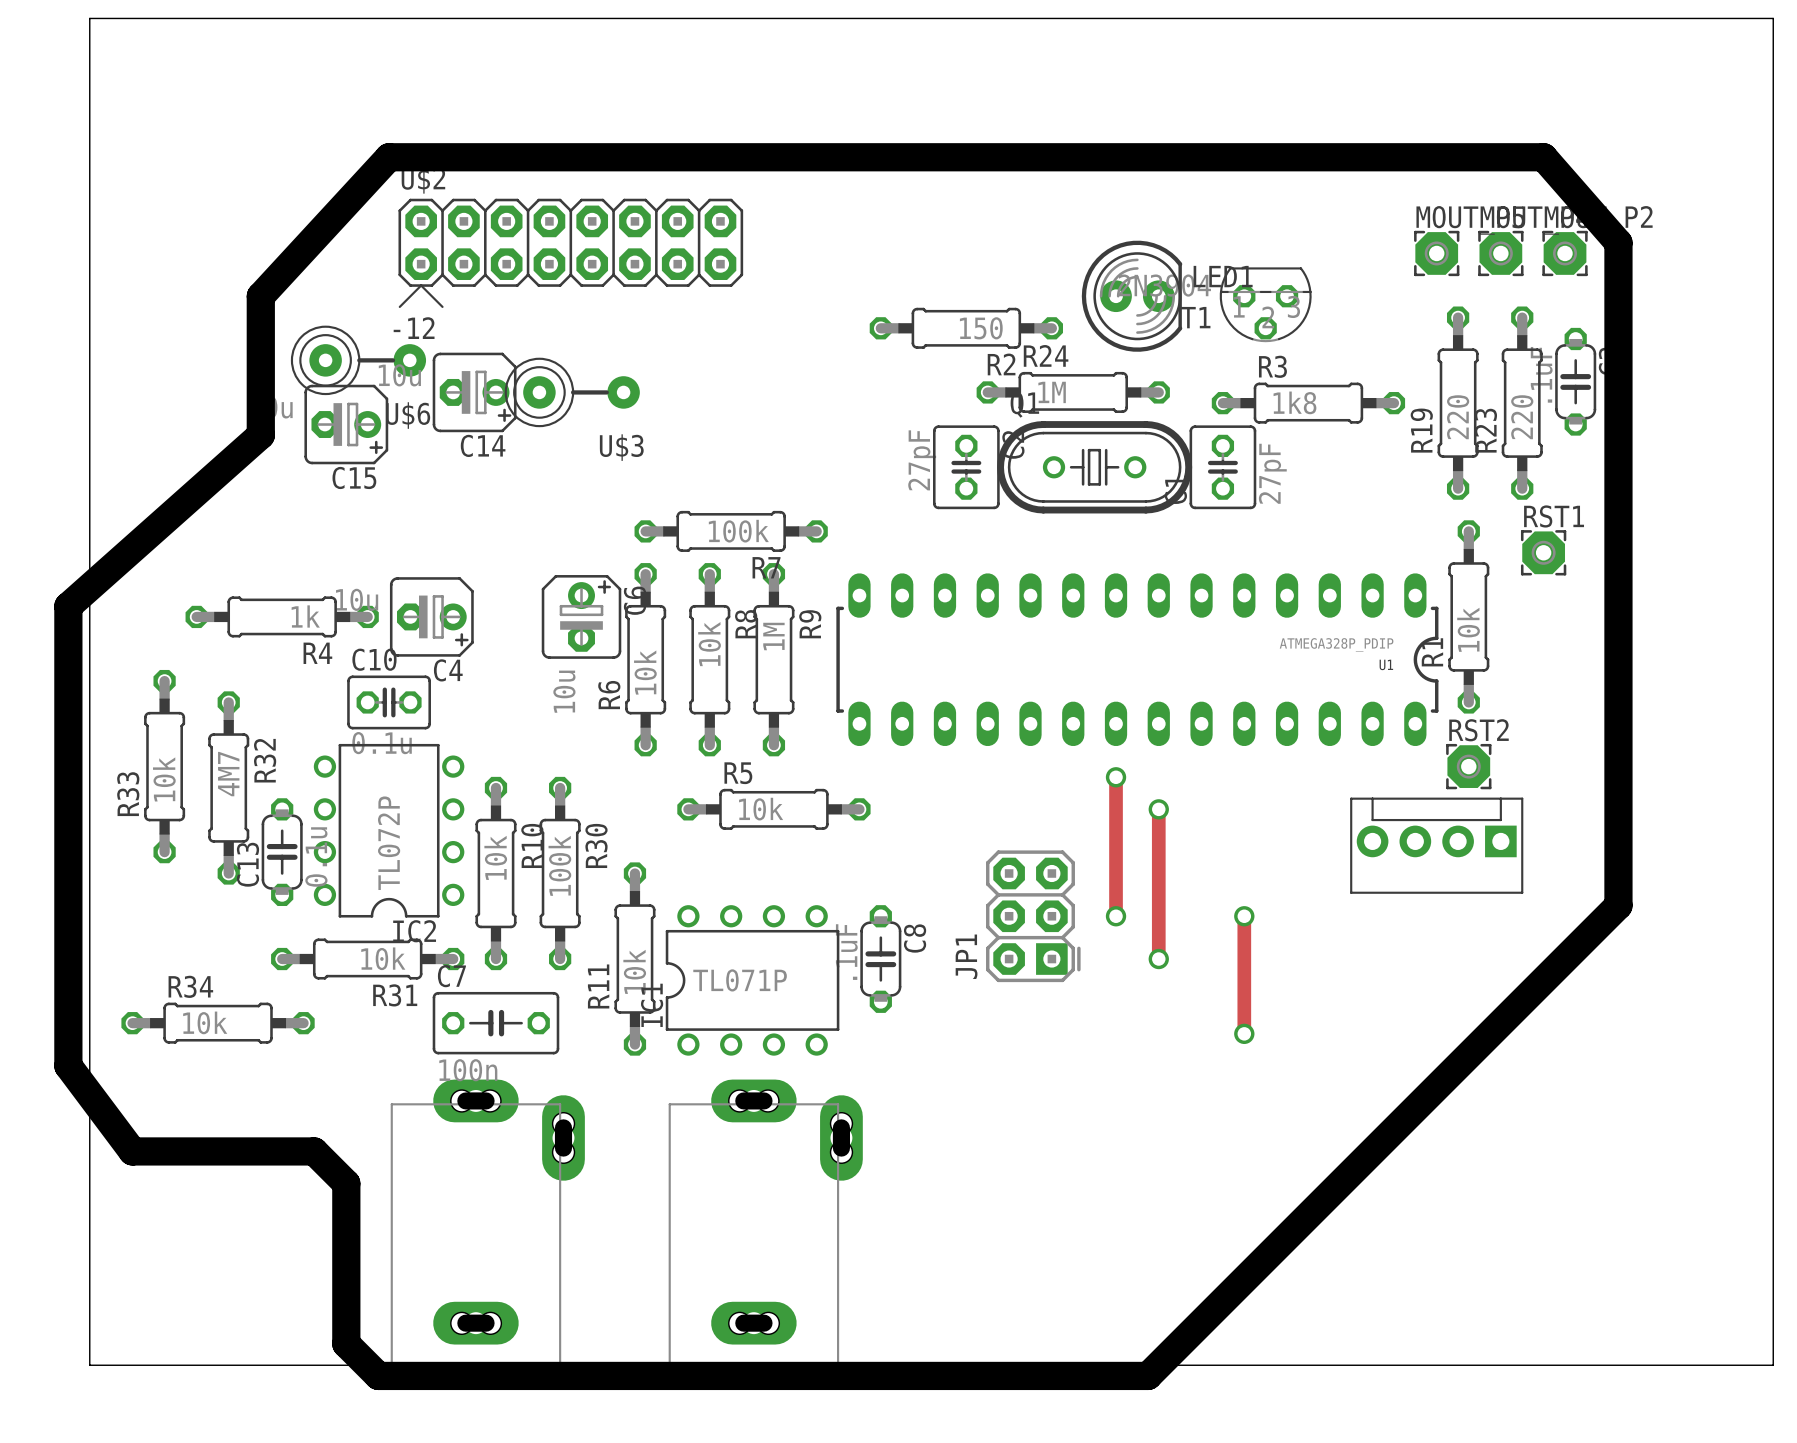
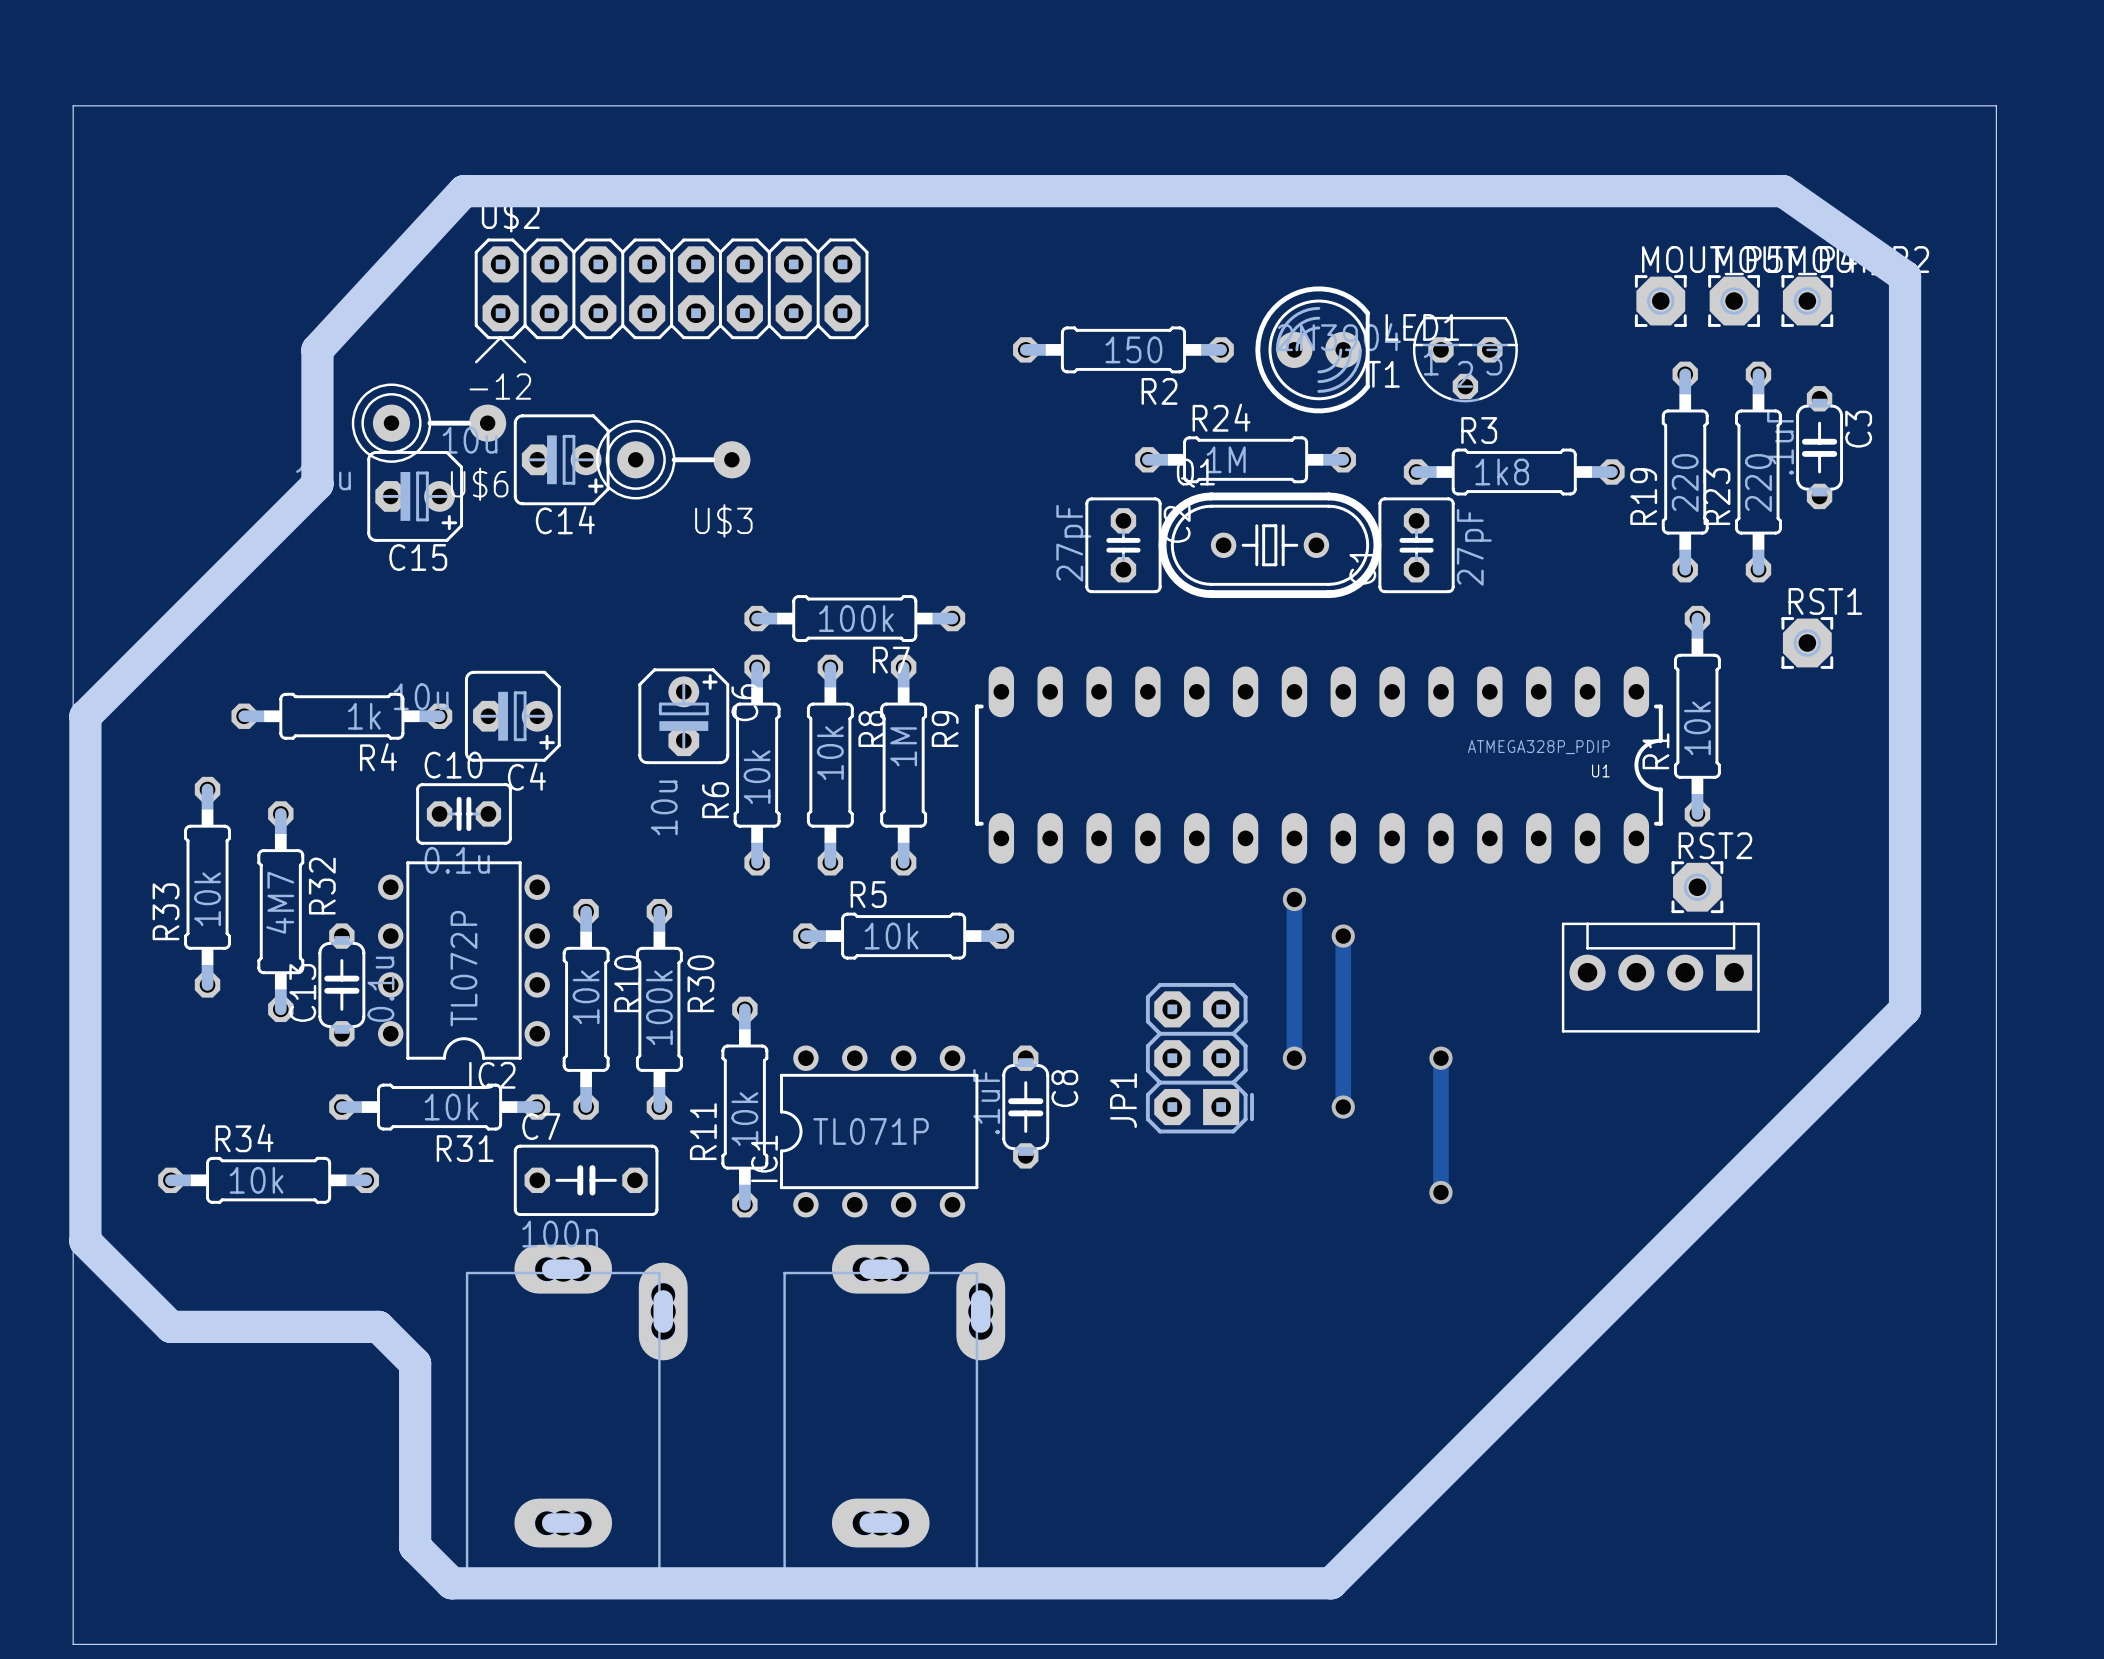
board edge: (89, 18) (1773, 18) (1773, 1365) (89, 1365) (89, 18) -> (73, 105) (1996, 105) (1996, 1644) (73, 1644) (73, 105)
board edge: (1543, 157) (1618, 242) (1618, 905) -> (1782, 191) (1905, 276) (1905, 1009) (1868, 1045)
R2 position: (966, 328) -> (1123, 349)
board edge: (260, 413) (260, 435) (68, 606) (68, 1065) (132, 1151) -> (317, 484) (85, 716) (85, 1241) (170, 1326)
RST1 position: (1543, 552) -> (1807, 642)

